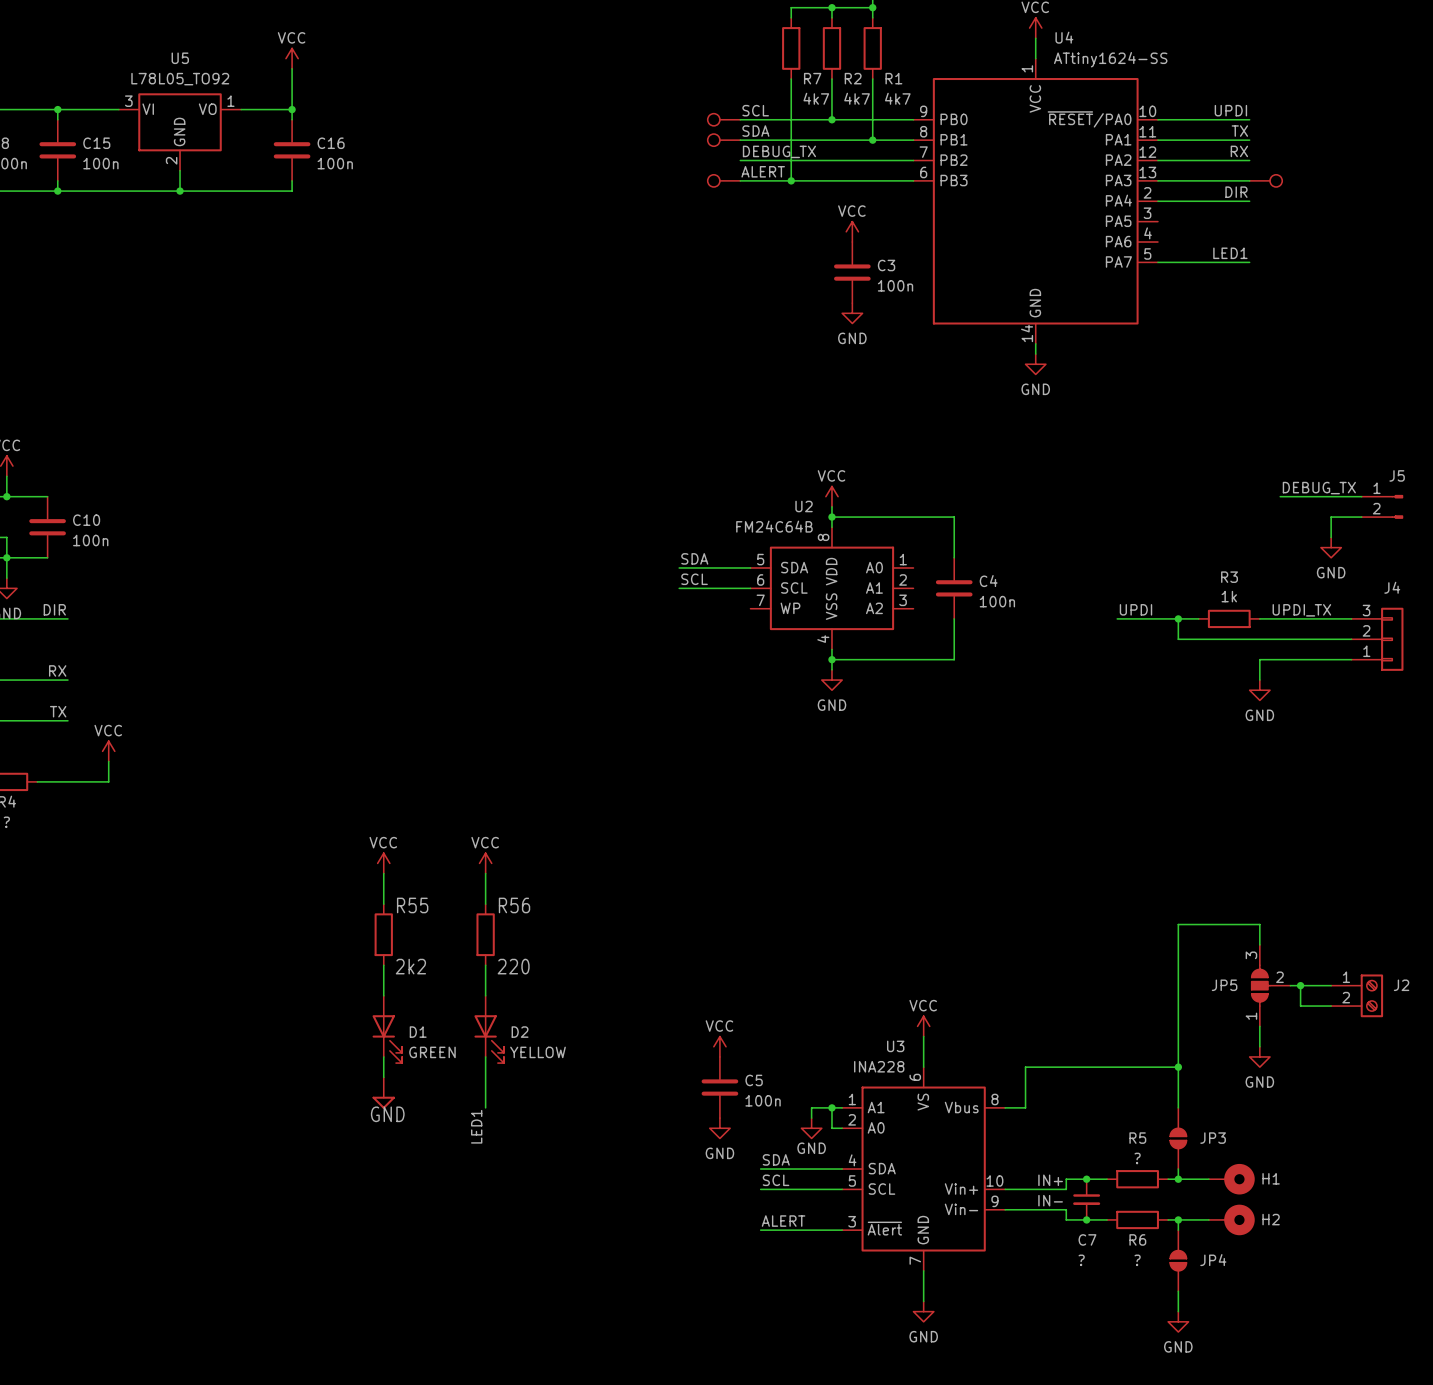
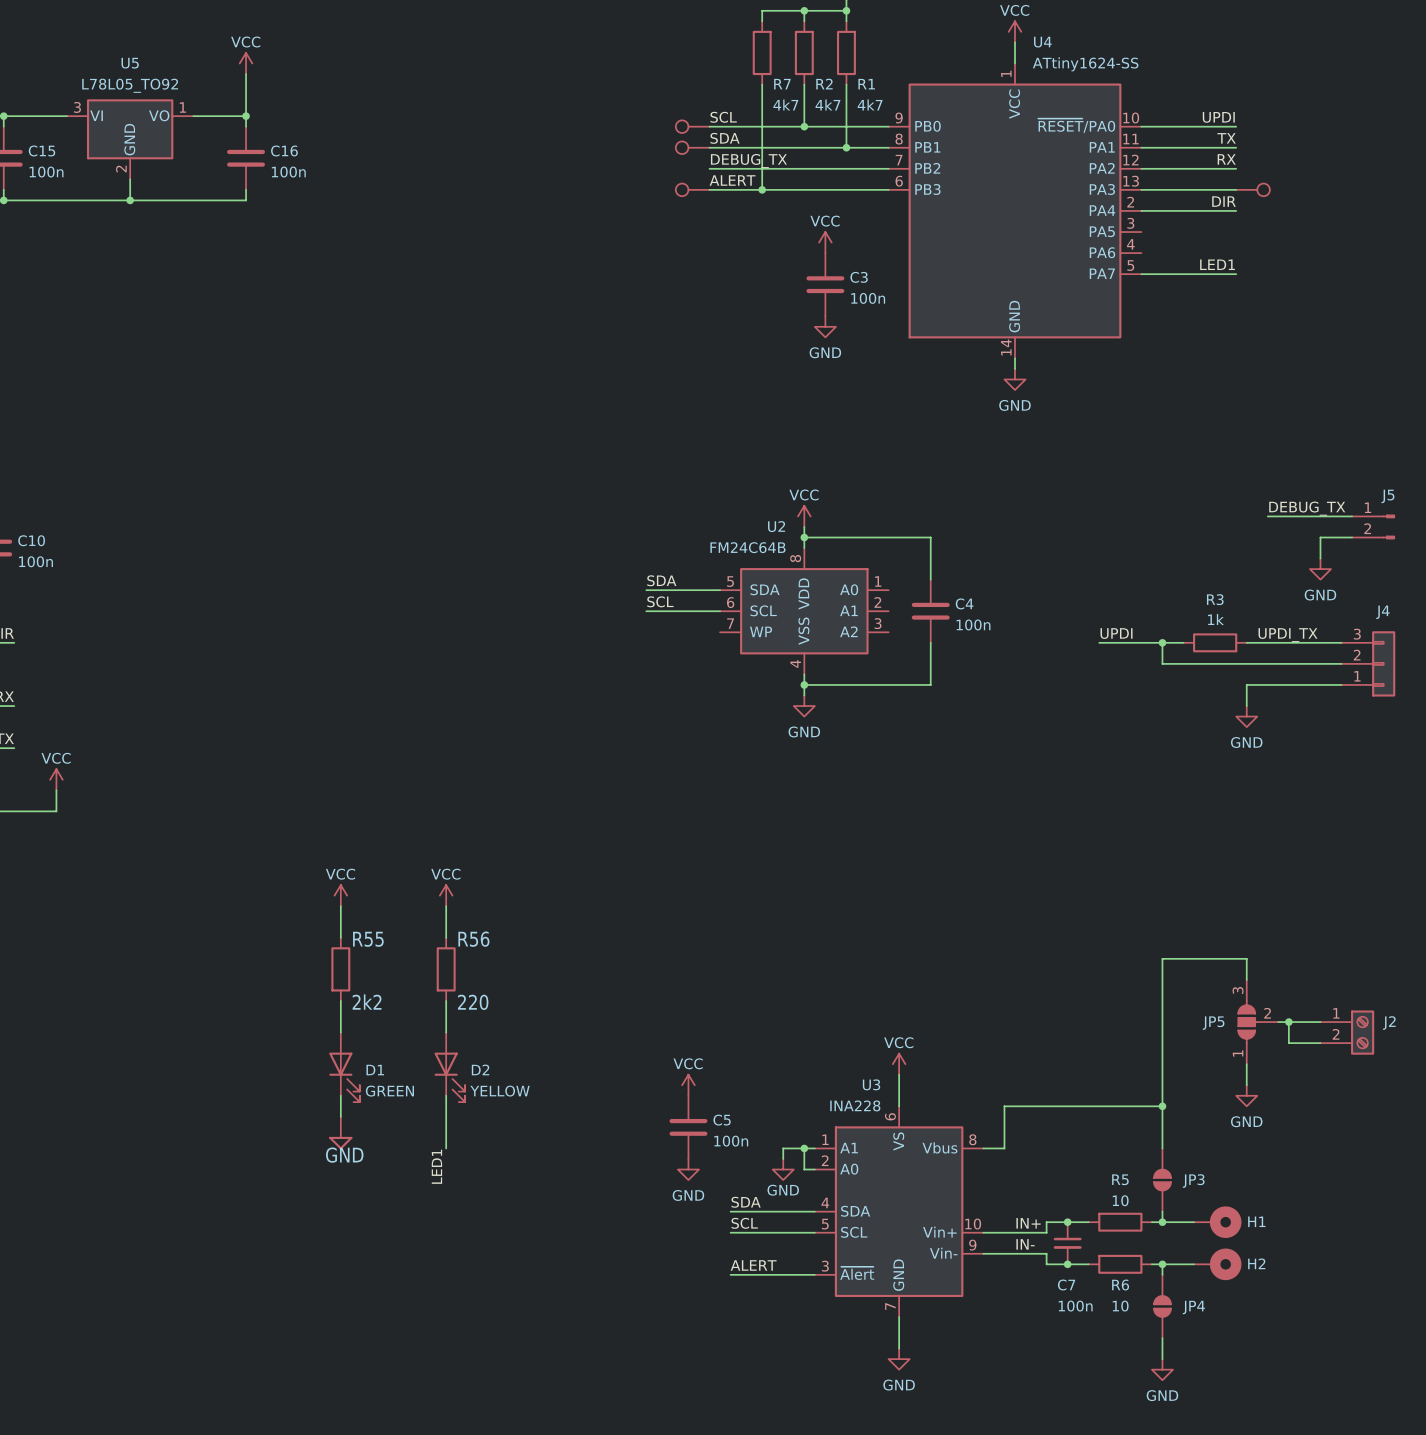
R5 value: ? (1137, 1158) -> 10 (1120, 1200)
C7 value: ? (1081, 1260) -> 100n (1075, 1306)
R6 value: ? (1137, 1260) -> 10 (1120, 1306)

